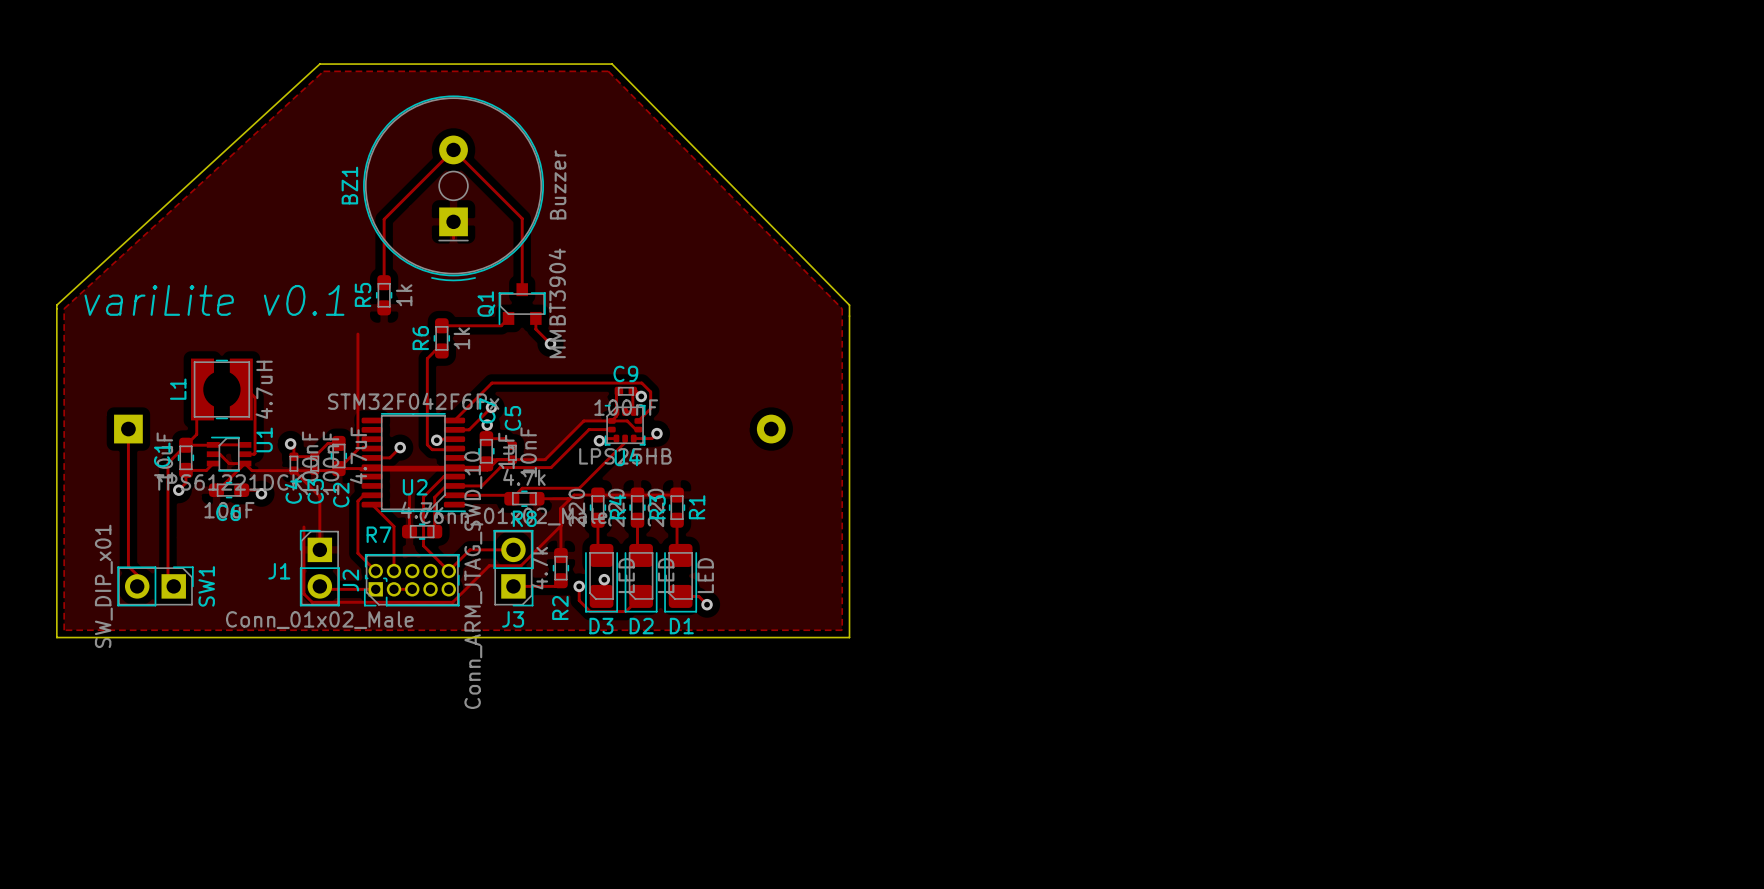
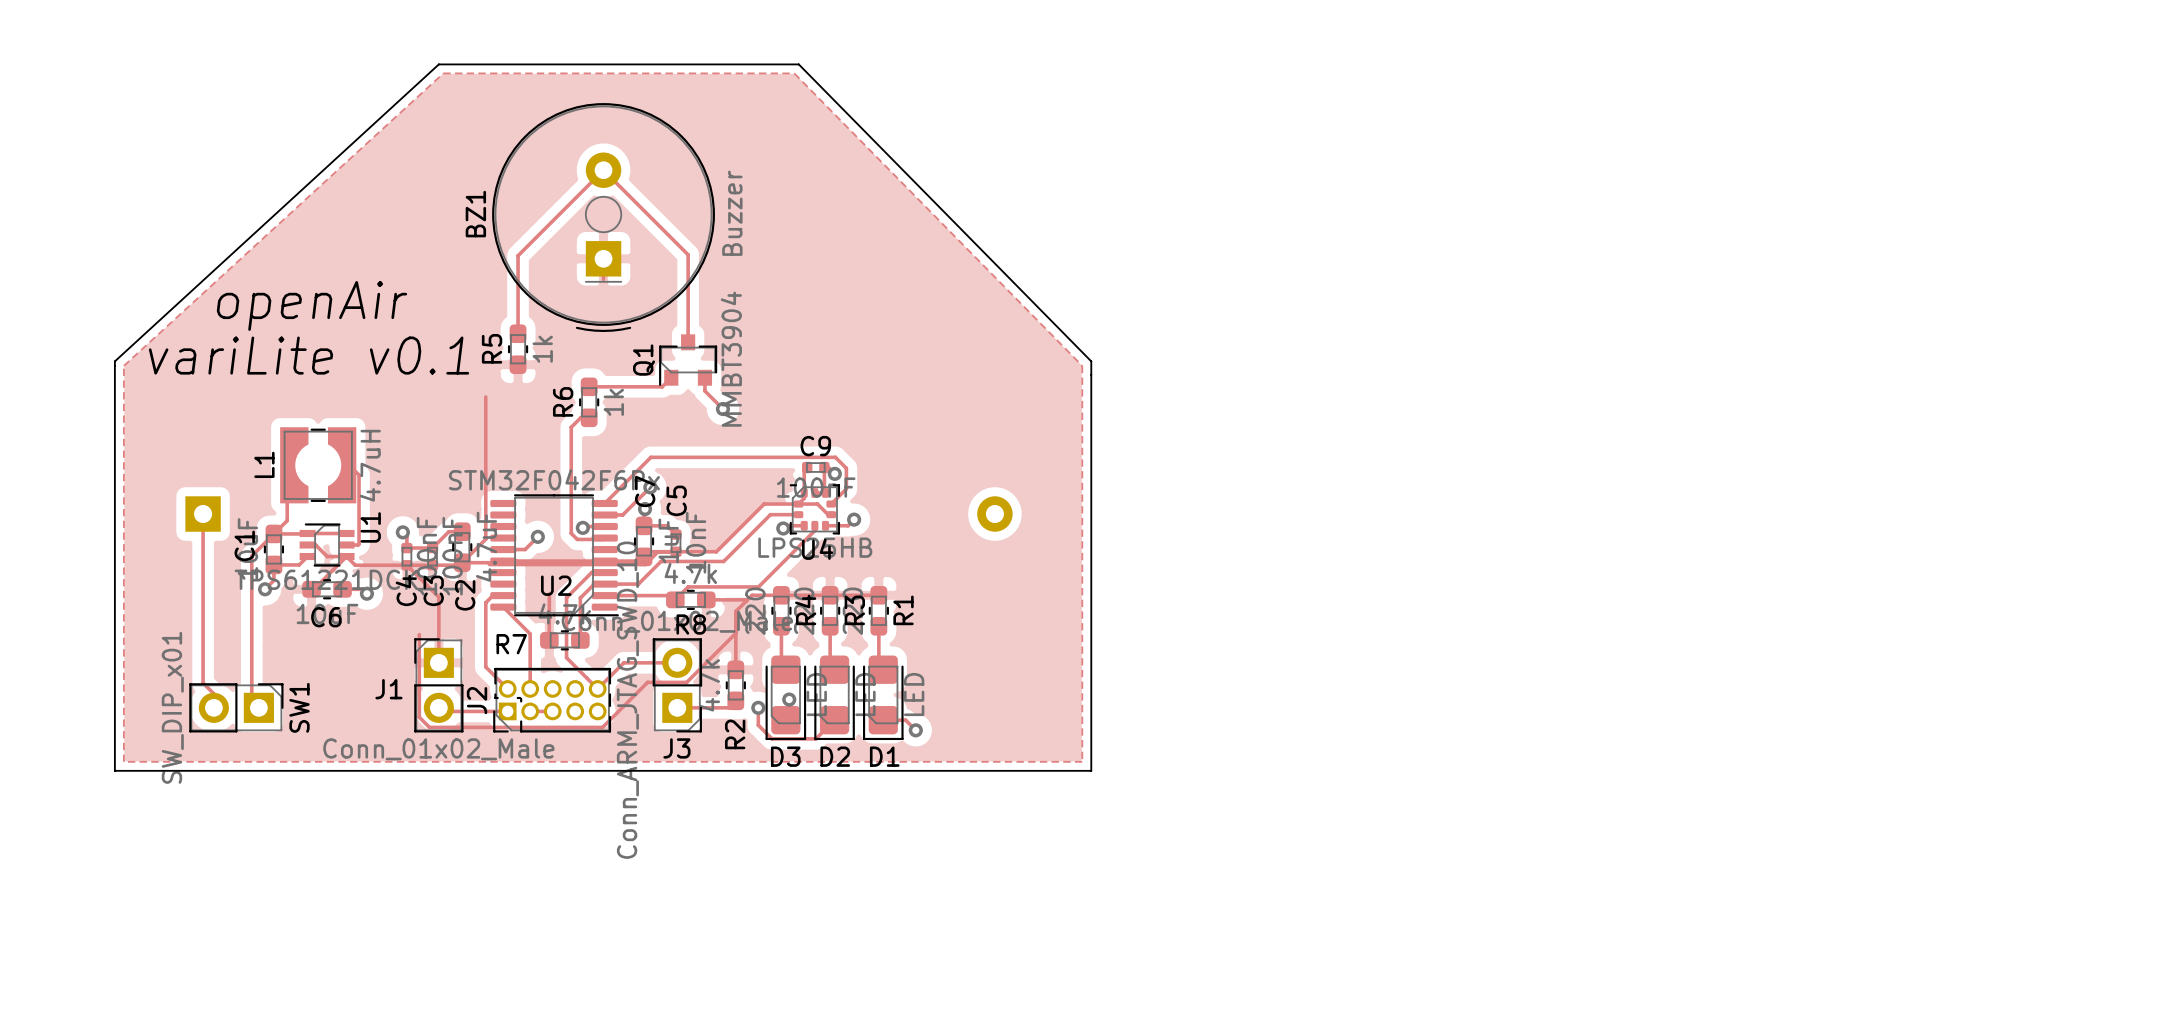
text: none -> openAir (311, 305)

